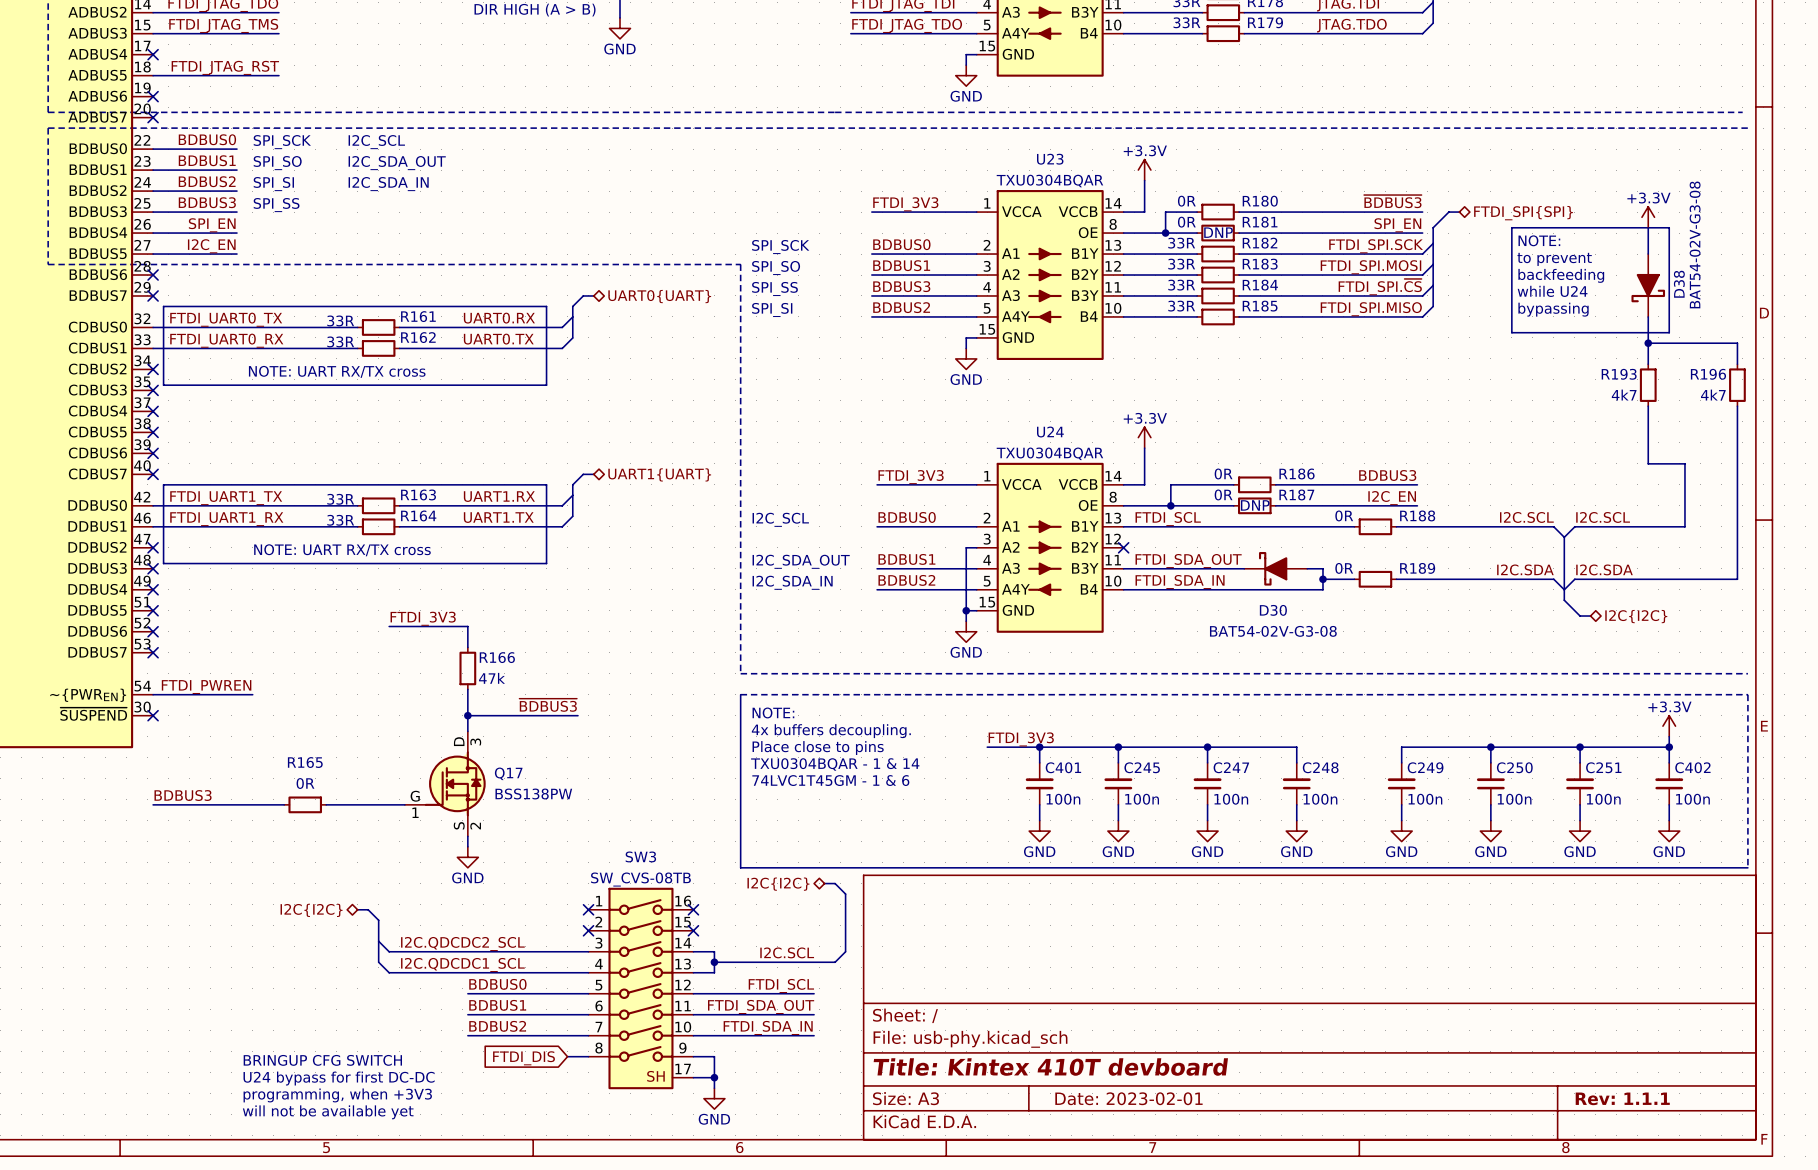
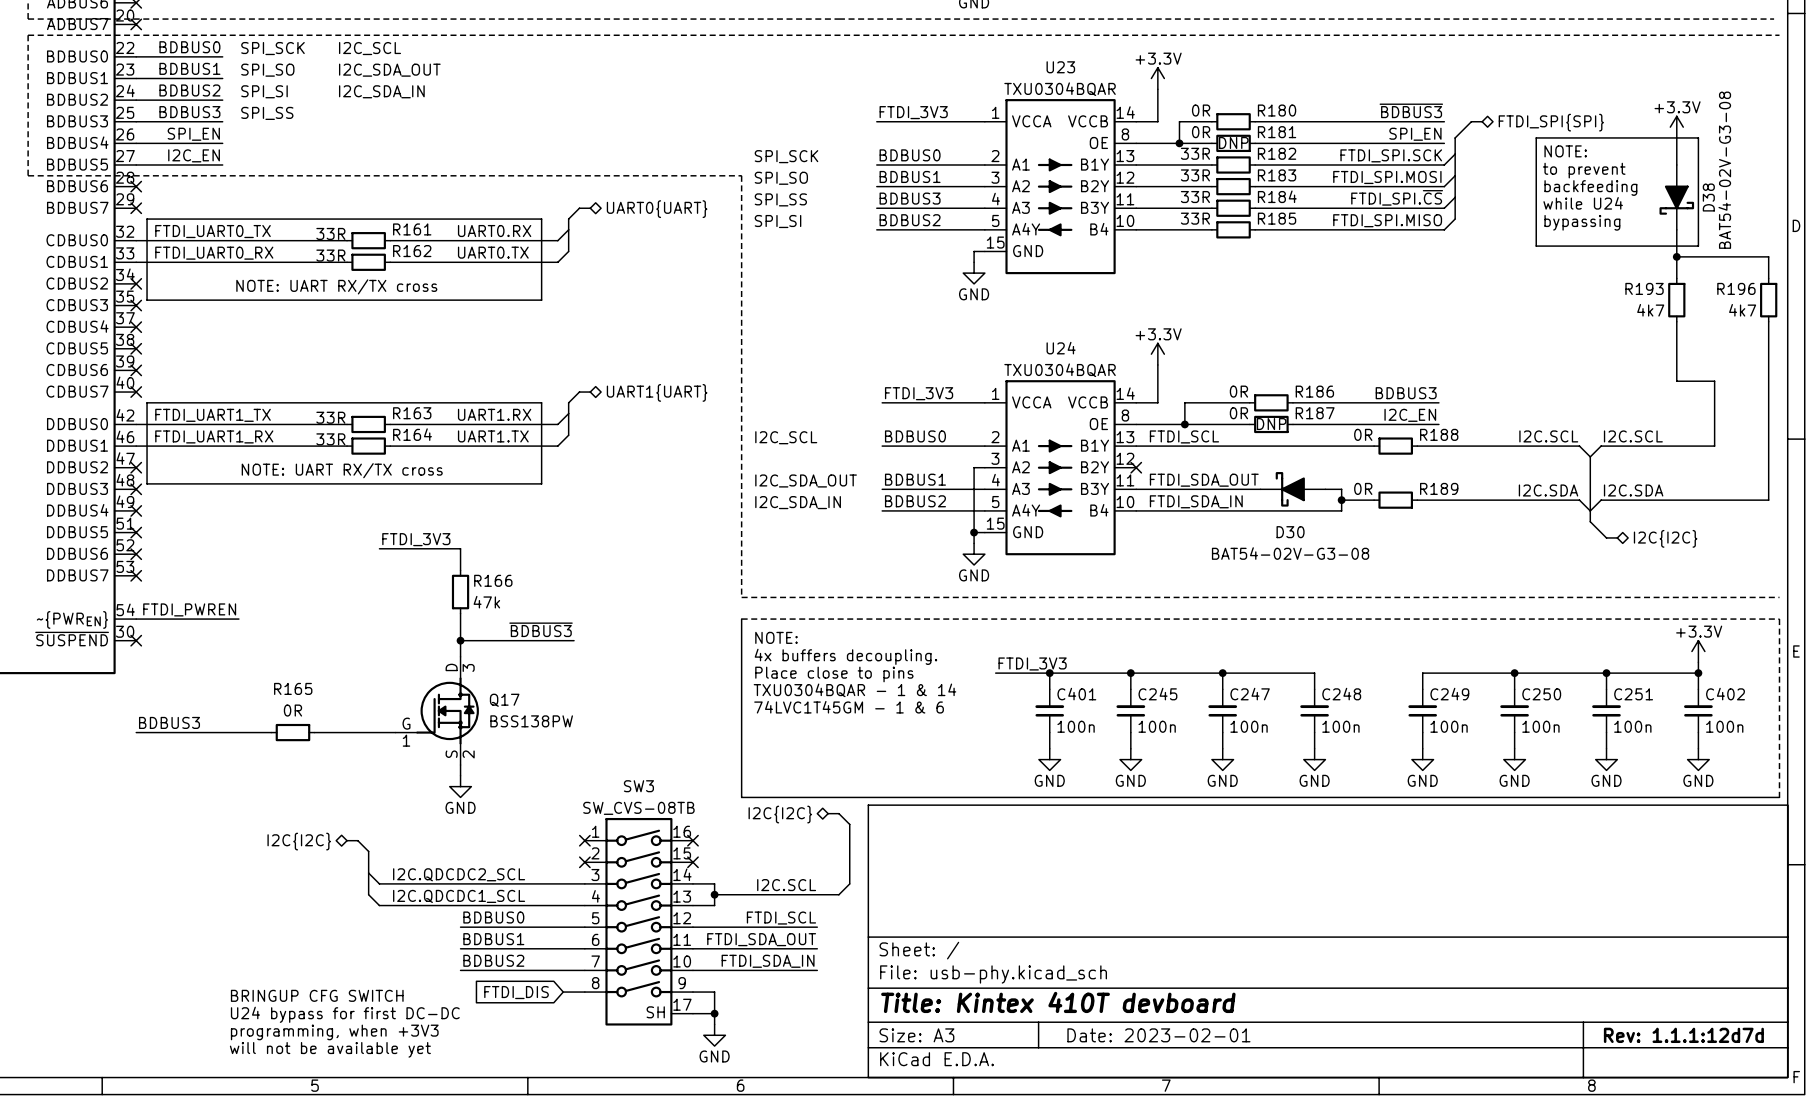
title block: Rev: 1.1.1 (1622, 1098) -> Rev: 1.1.1:12d7d (1683, 1035)

